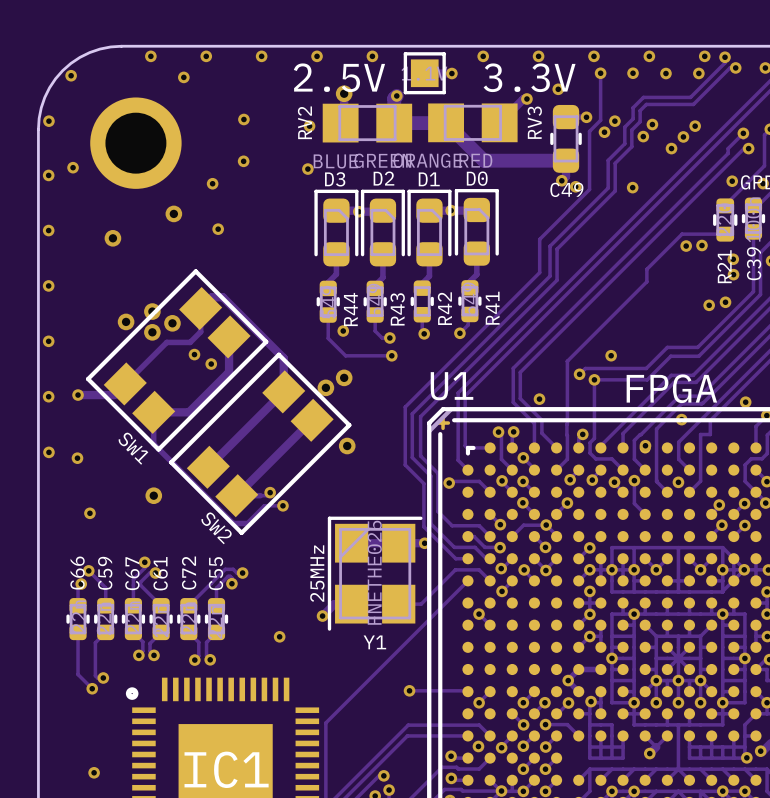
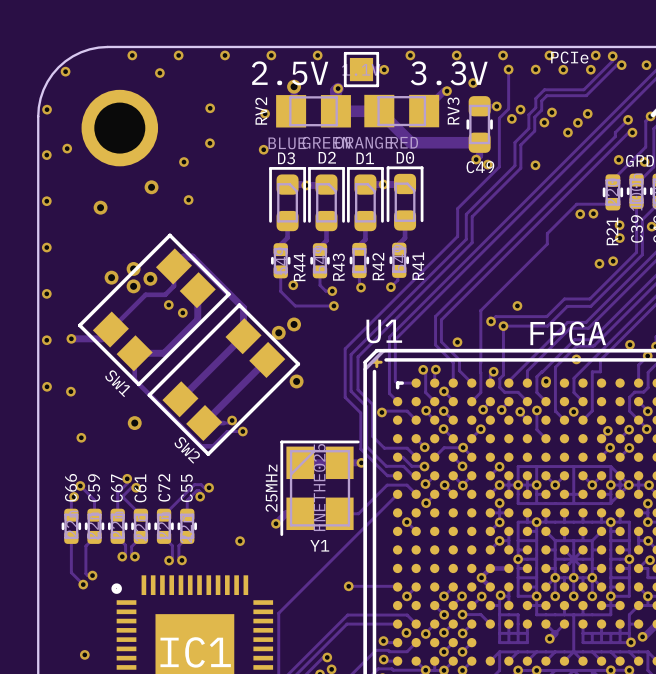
text: none -> PCIe (569, 57)

